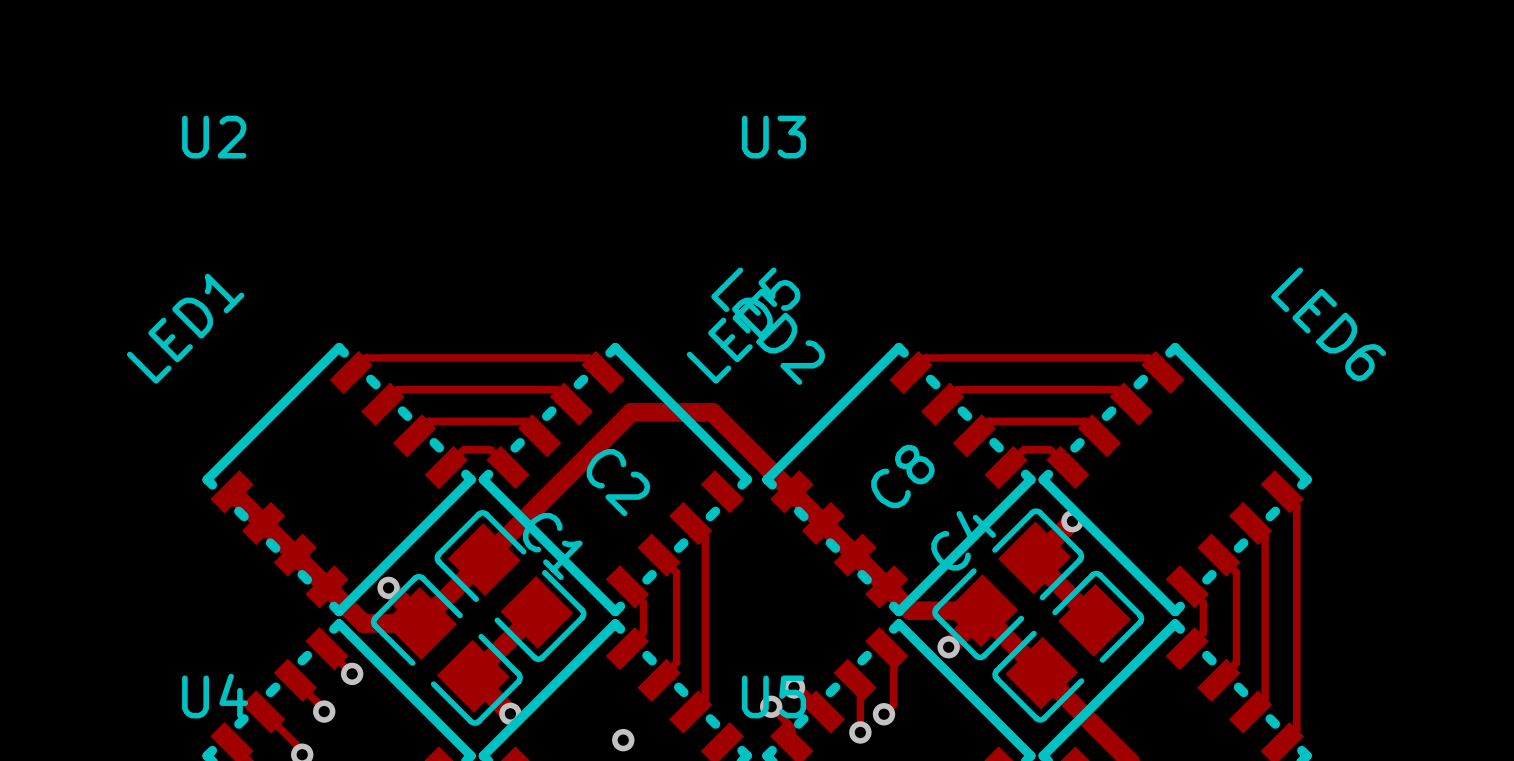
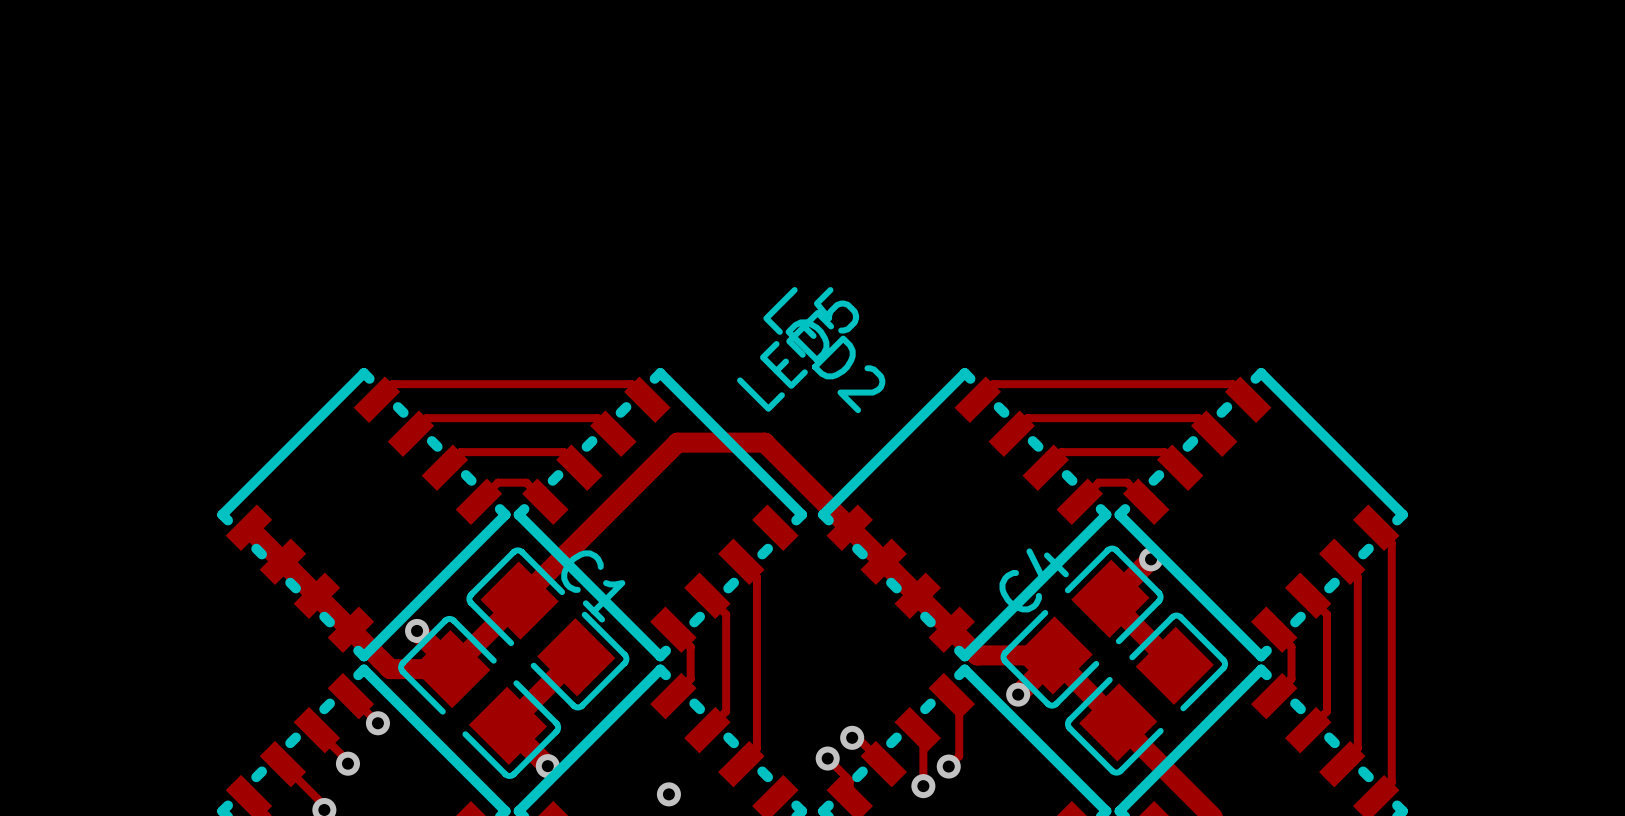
U2: (214, 137) -> none
U3: (774, 137) -> none
LED6 name: LED6 (1328, 324) -> none
LED1 name: LED1 (185, 328) -> none
C8 name: C8 (902, 476) -> none
C2 name: C2 (618, 482) -> none
U4: (215, 696) -> none
U5: (774, 696) -> none

